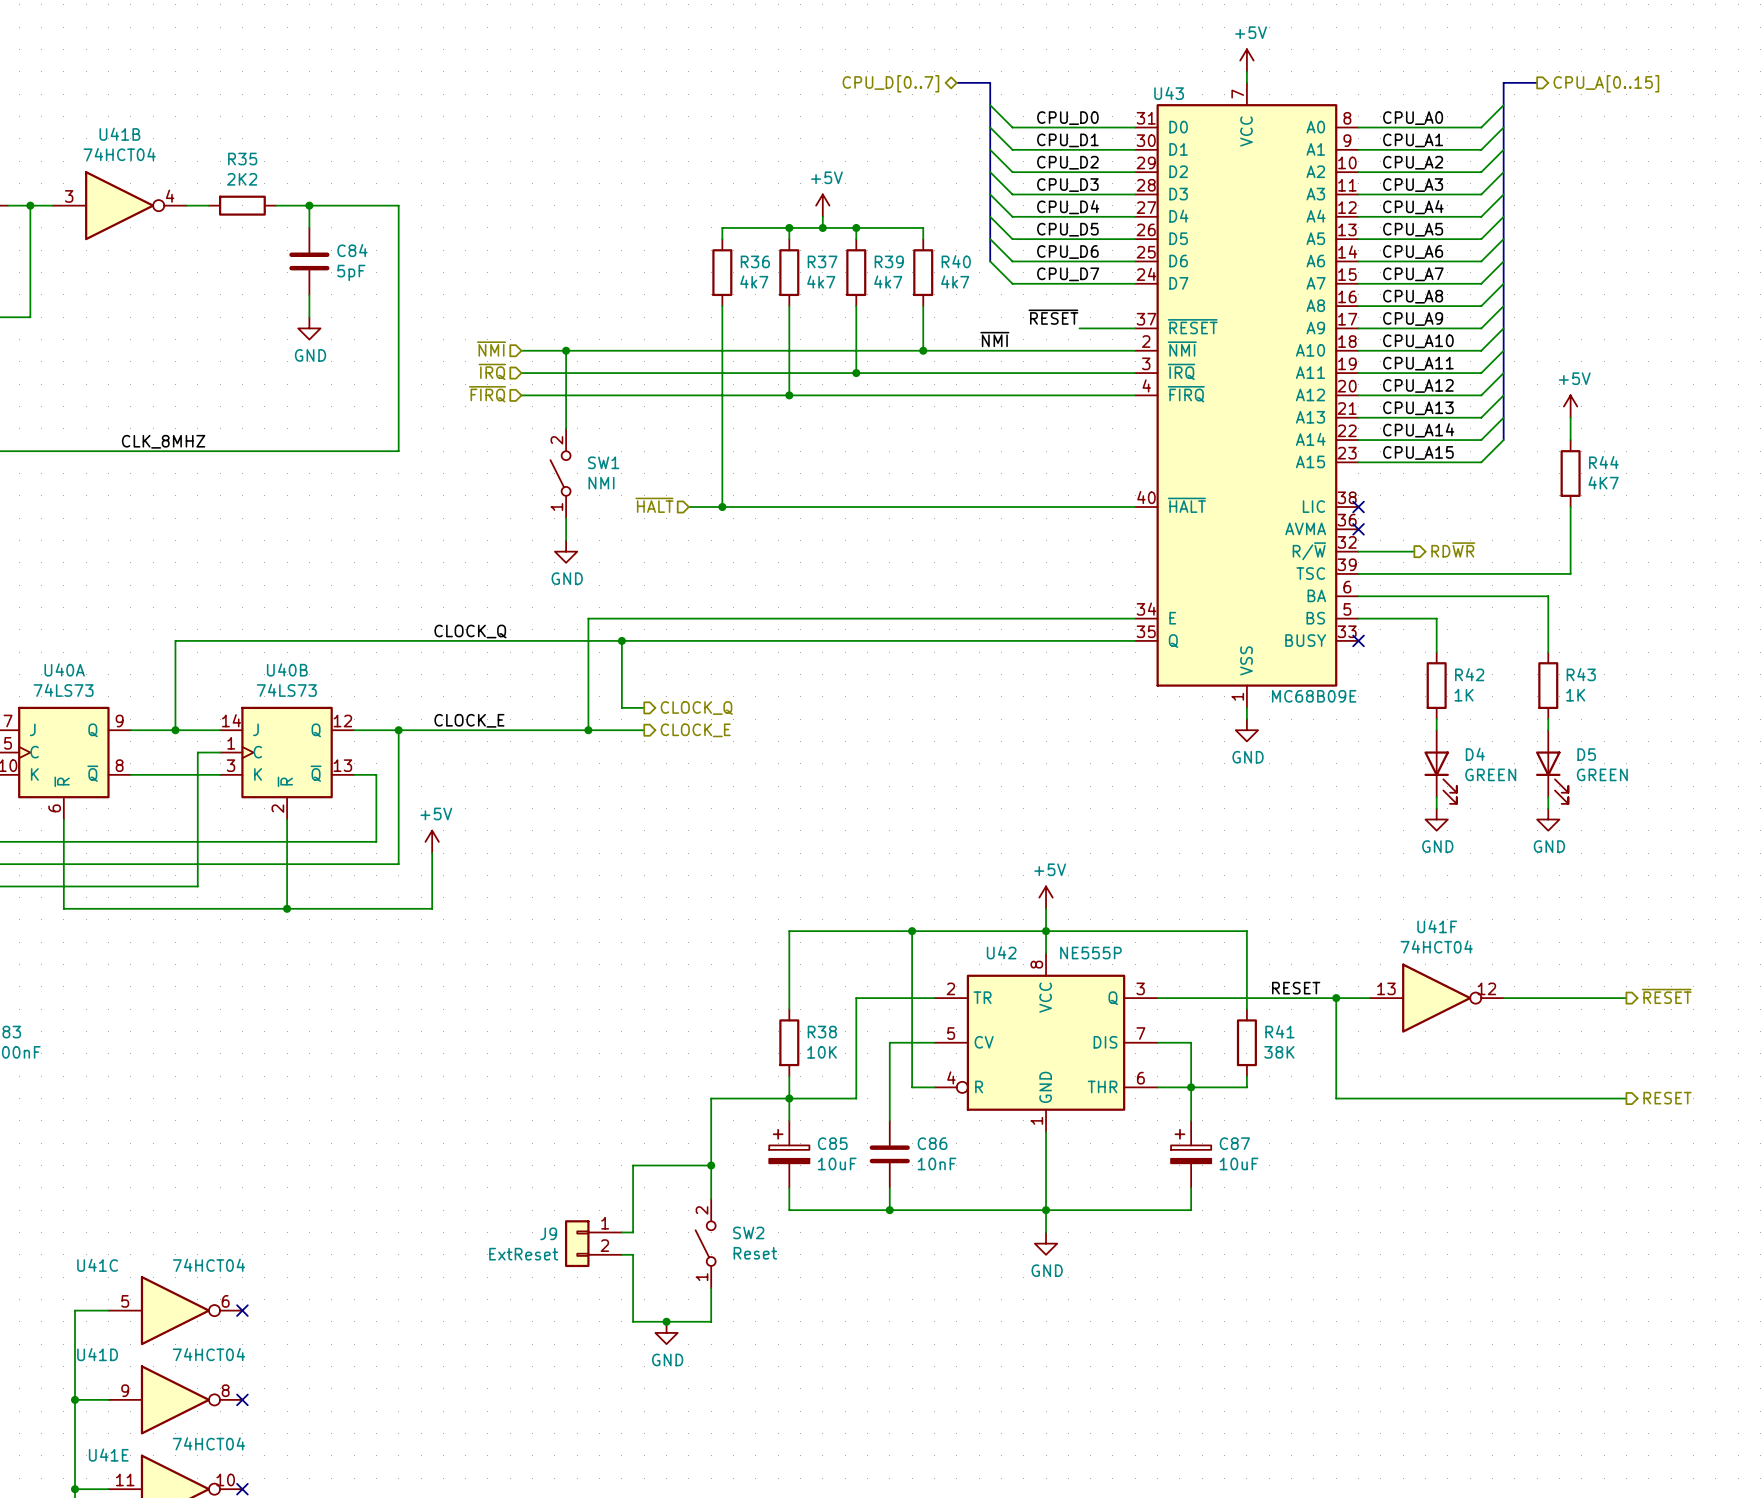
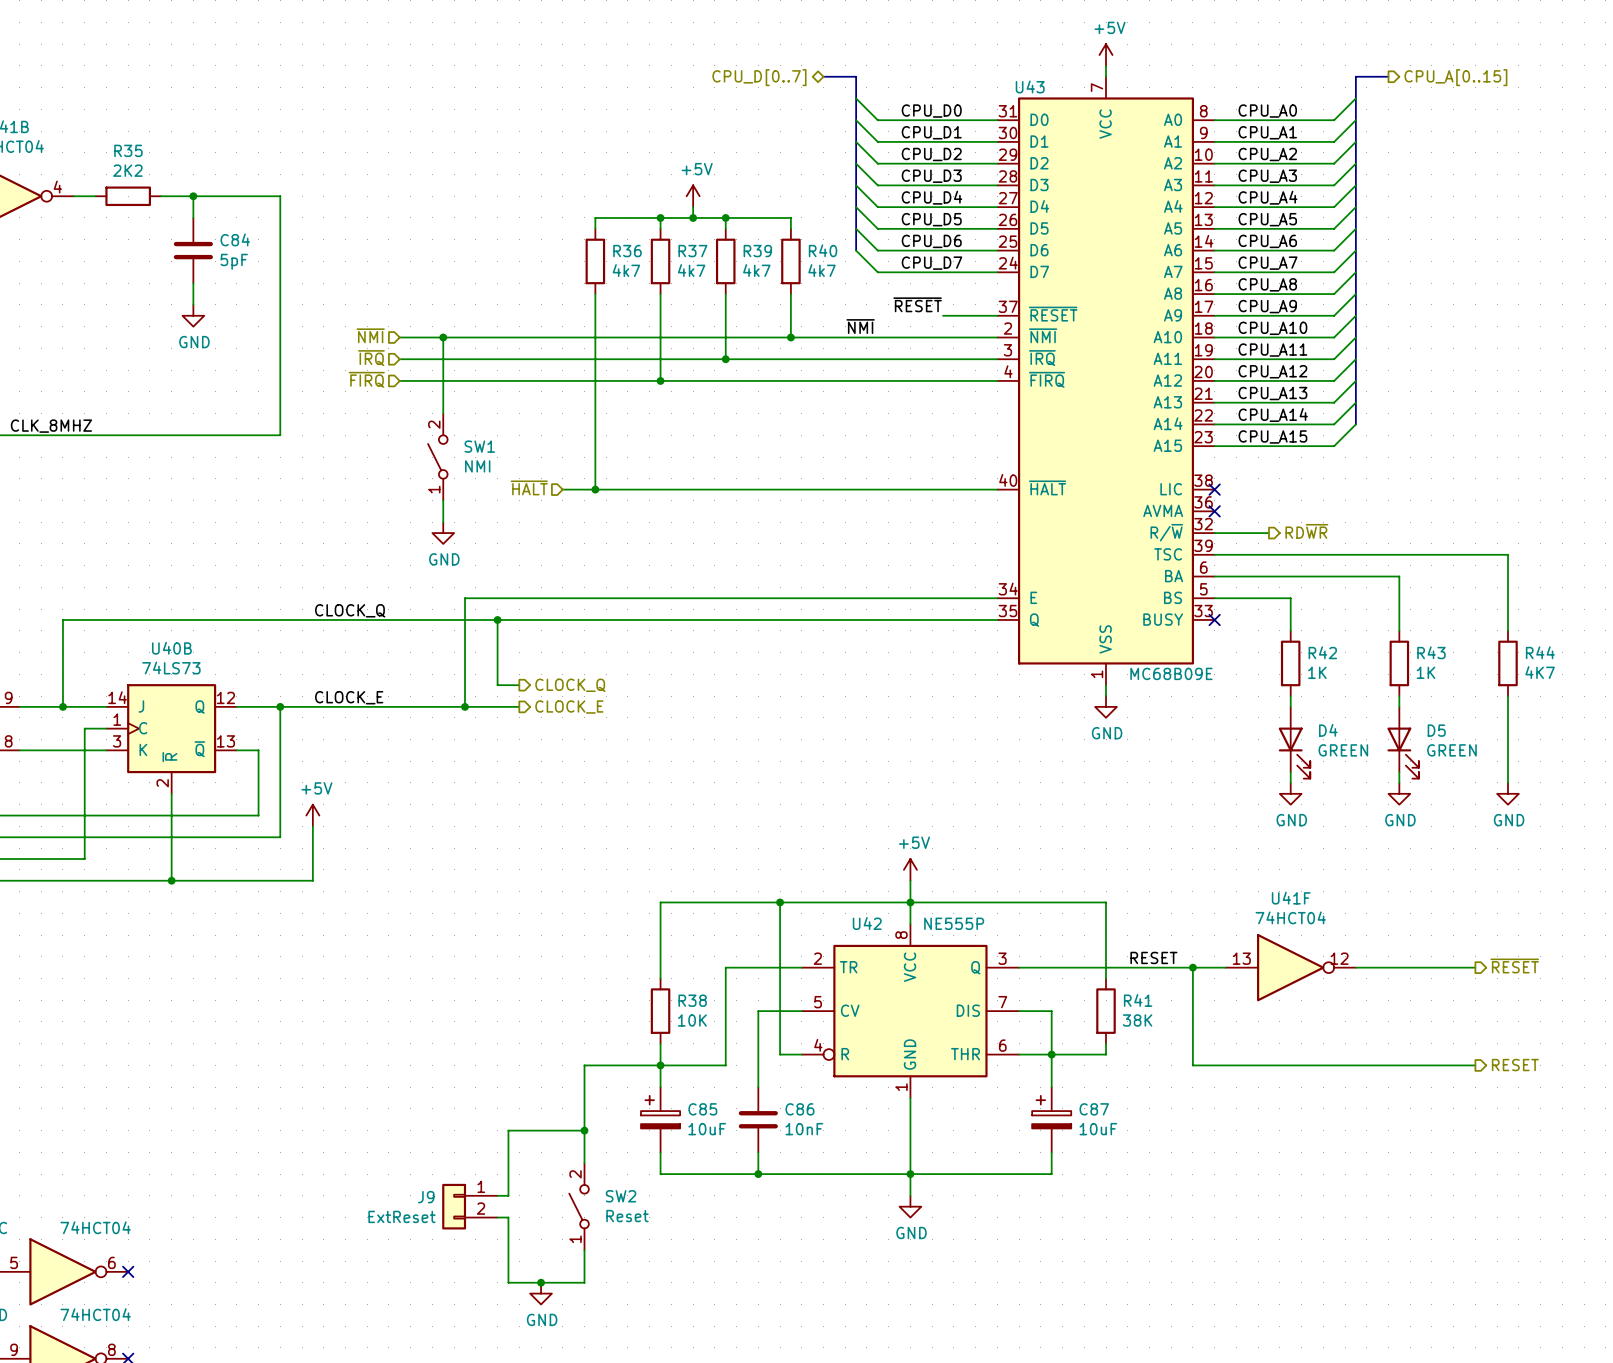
power symbol: +5V (1570, 406) -> none
wire: (1570, 417) (1570, 440) -> none
R44 position: (1570, 473) -> (1507, 663)
wire: (1570, 507) (1570, 573) -> (1507, 630) (1507, 554) (1421, 554)
wire: none -> (1507, 696) (1507, 782)
power symbol: none -> GND (1507, 793)

